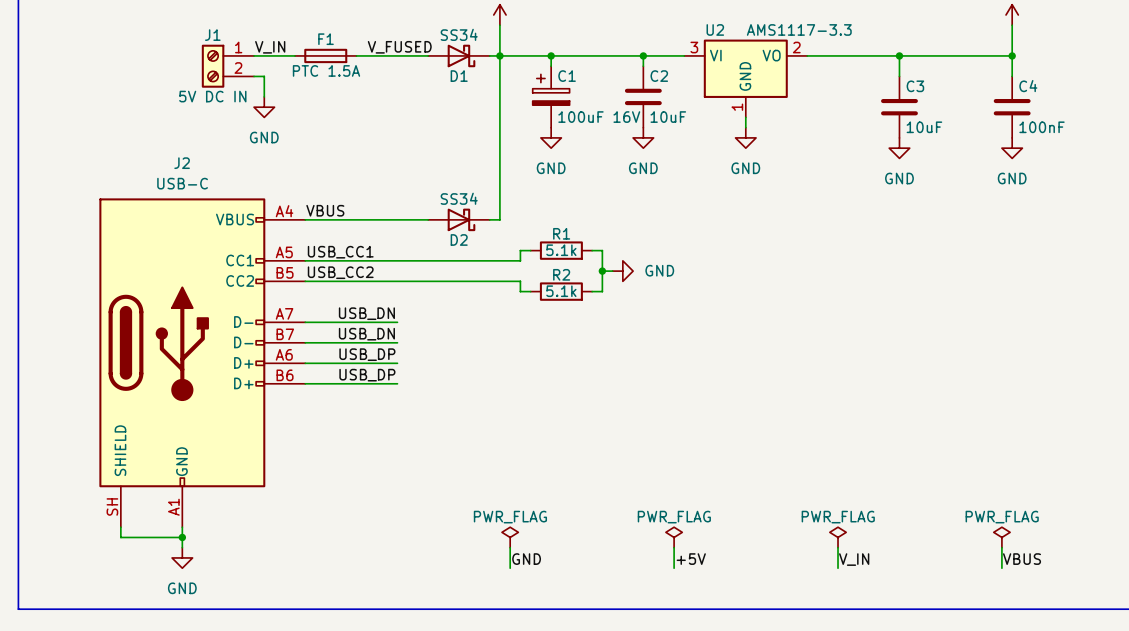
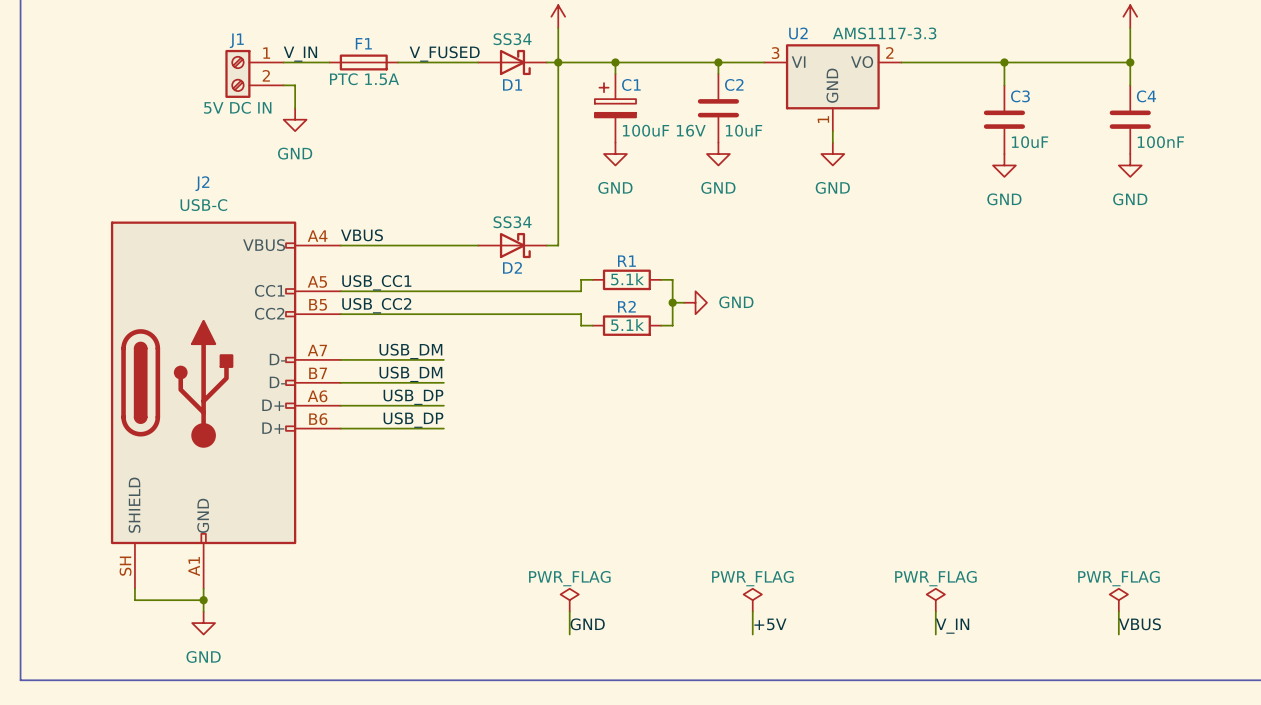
label: USB_DN (366, 313) -> USB_DM (410, 351)
label: USB_DN (366, 334) -> USB_DM (410, 374)

